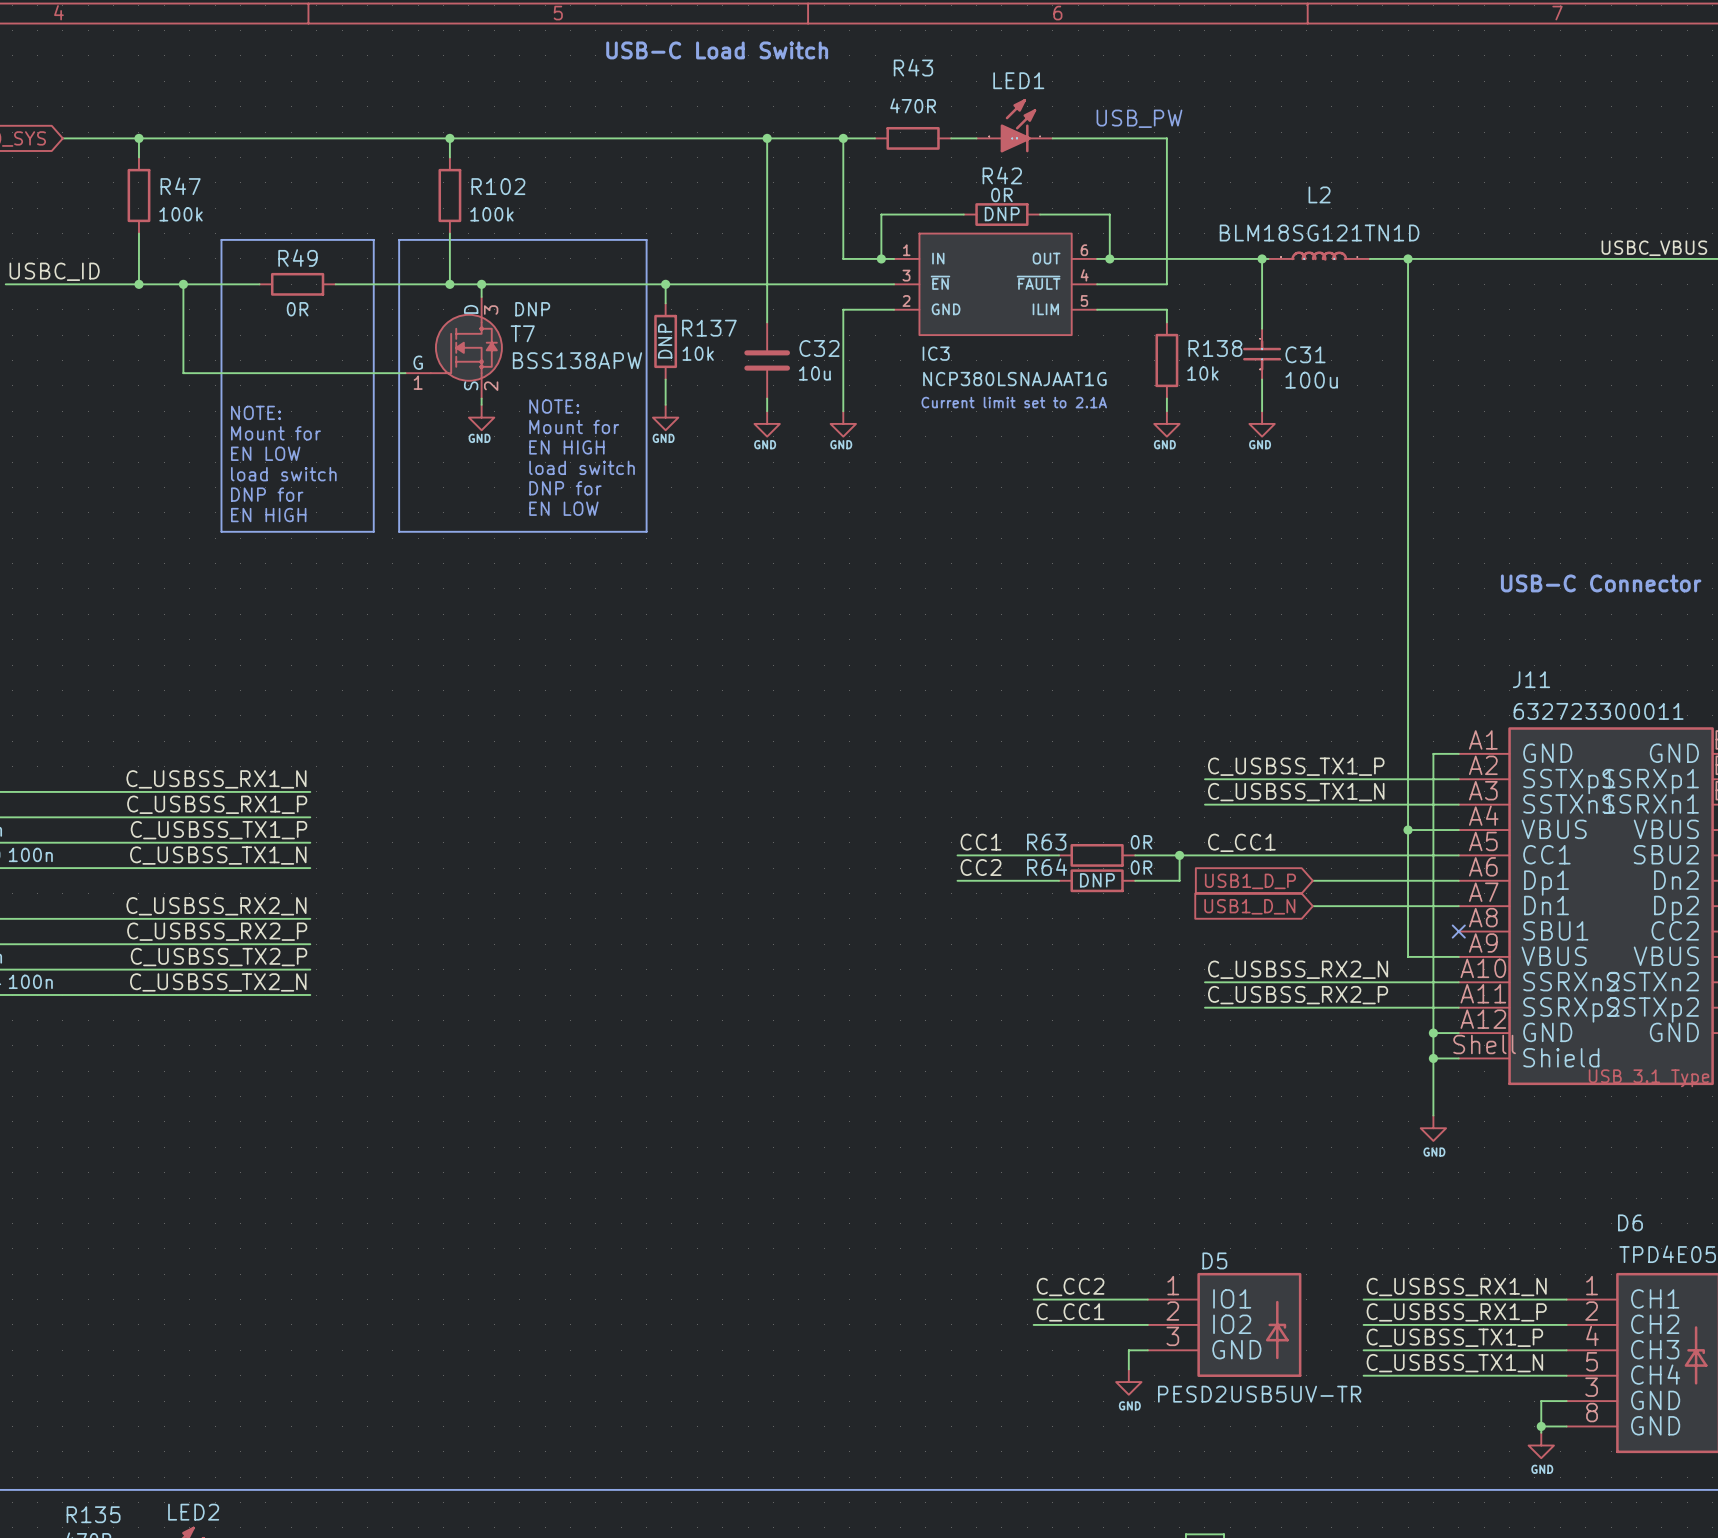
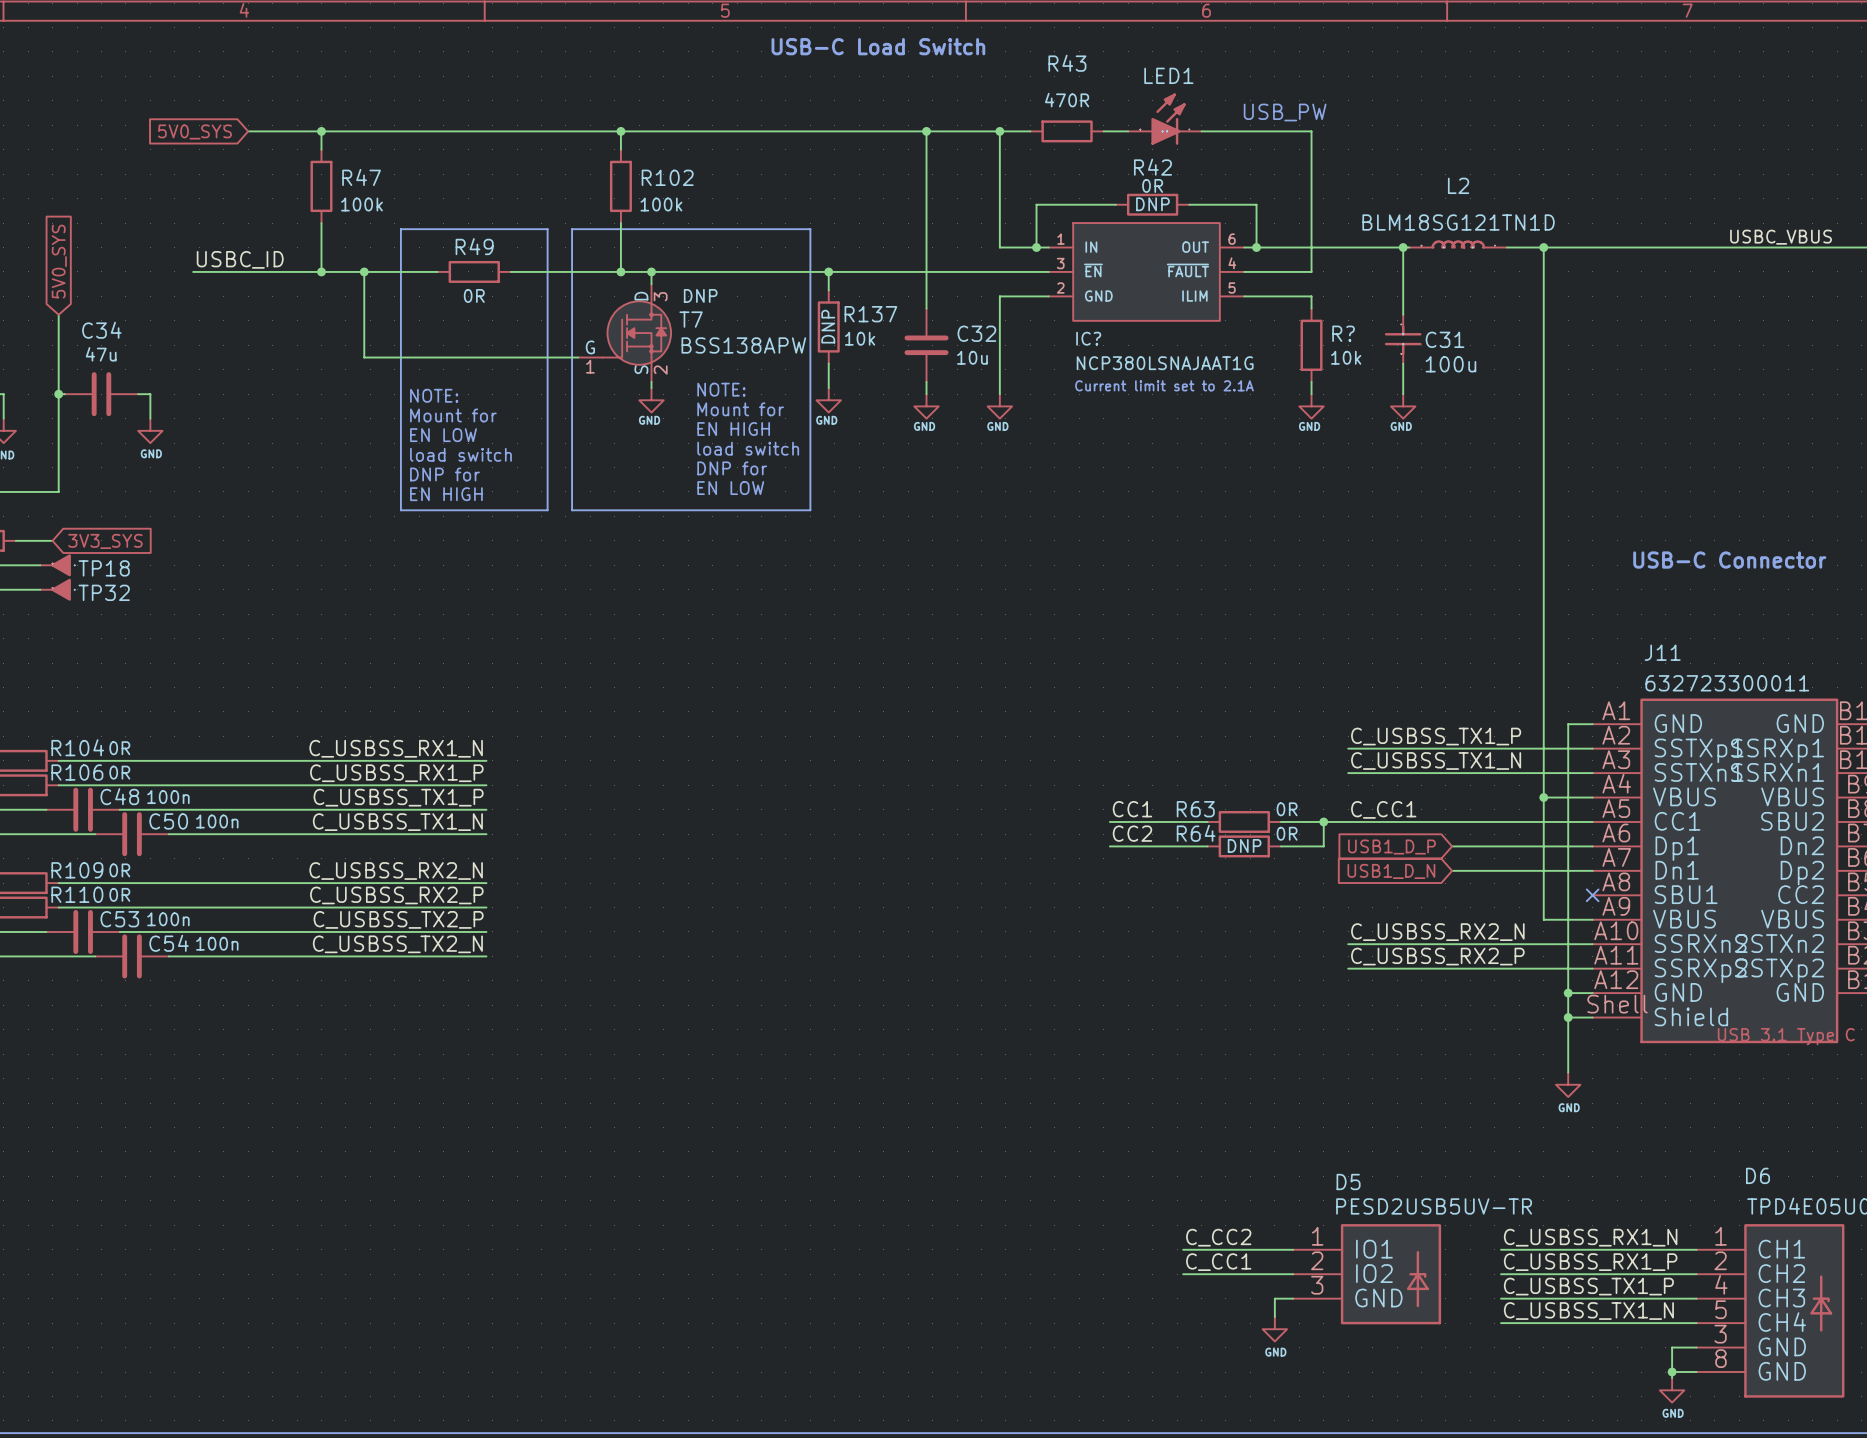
R138 name: R138 (1215, 348) -> R? (1343, 333)
IC3 name: IC3 (936, 353) -> IC? (1088, 338)
D5 name position: D5 (1214, 1260) -> D5 (1348, 1182)
D5 value position: PESD2USB5UV-TR (1259, 1394) -> PESD2USB5UV-TR (1434, 1206)

